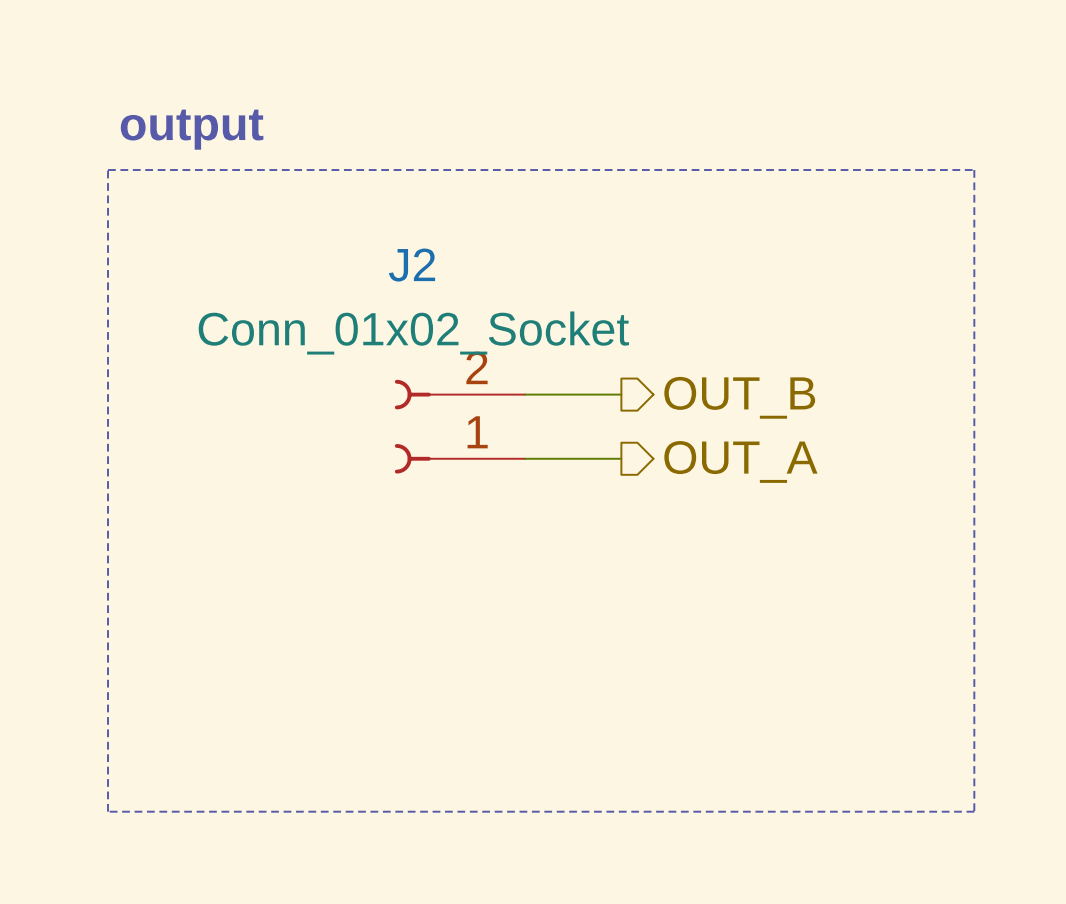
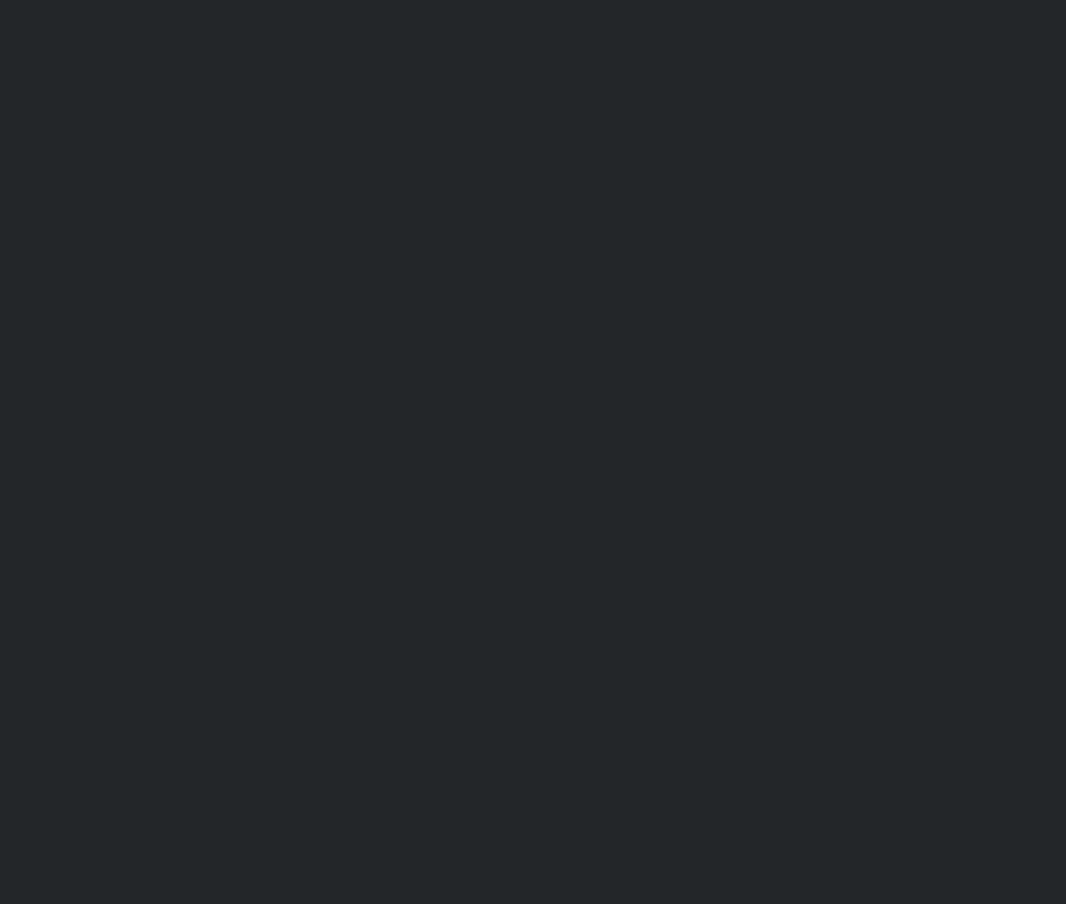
text: output (192, 129) -> none
line: (108, 170) (974, 170) (974, 811) (108, 811) (108, 170) -> none
wire: (525, 394) (621, 394) -> none
hierarchical label: OUT_B (739, 397) -> none
J2: Conn_01x02_Socket (459, 426) -> none
wire: (525, 458) (621, 458) -> none
hierarchical label: OUT_A (740, 461) -> none

